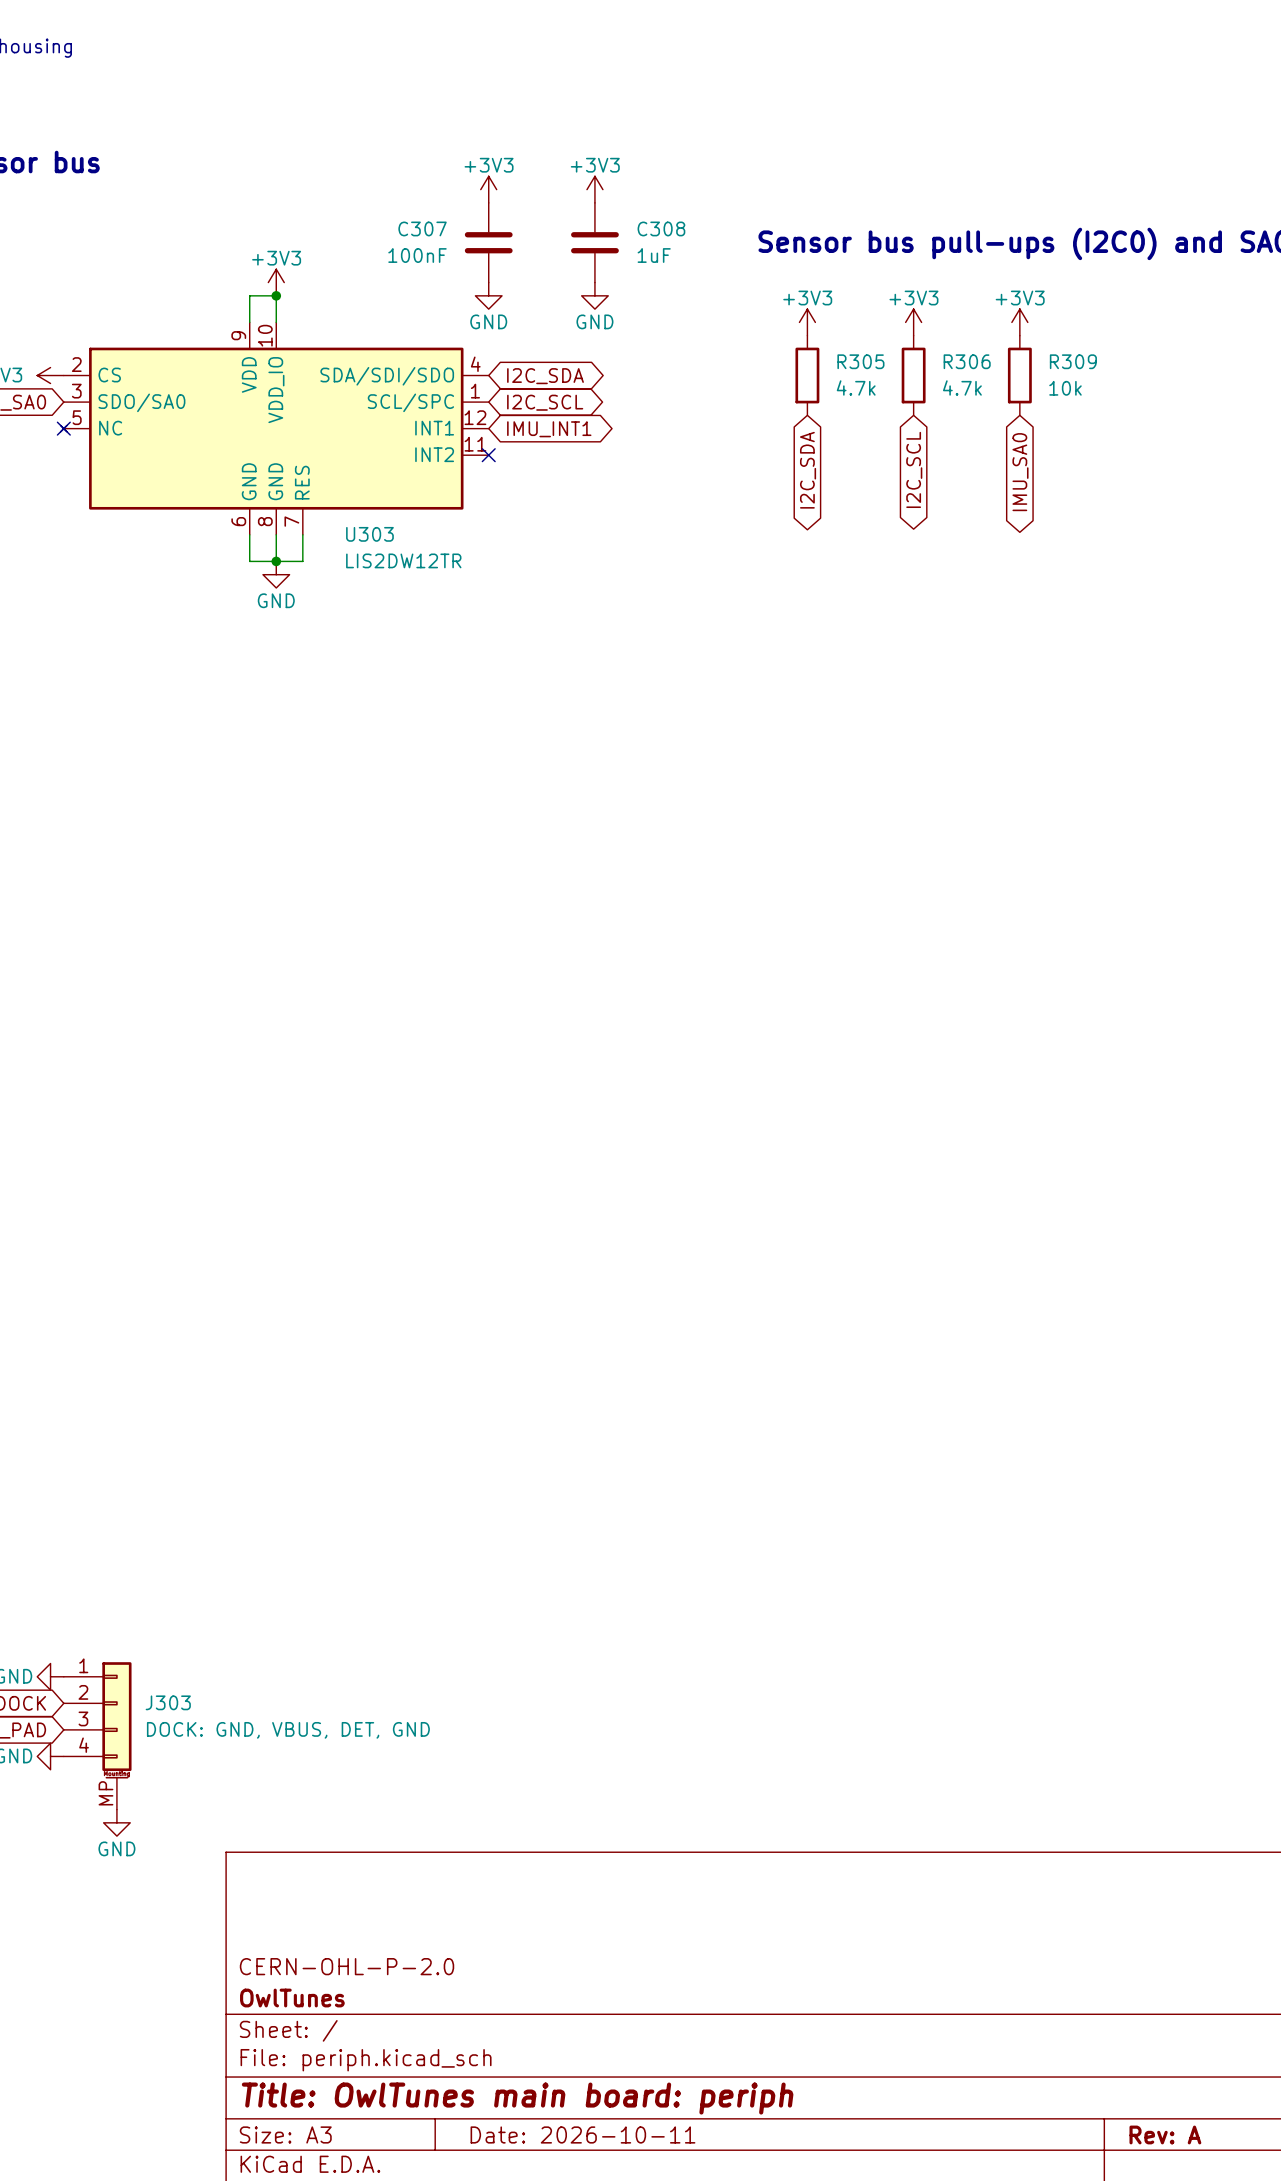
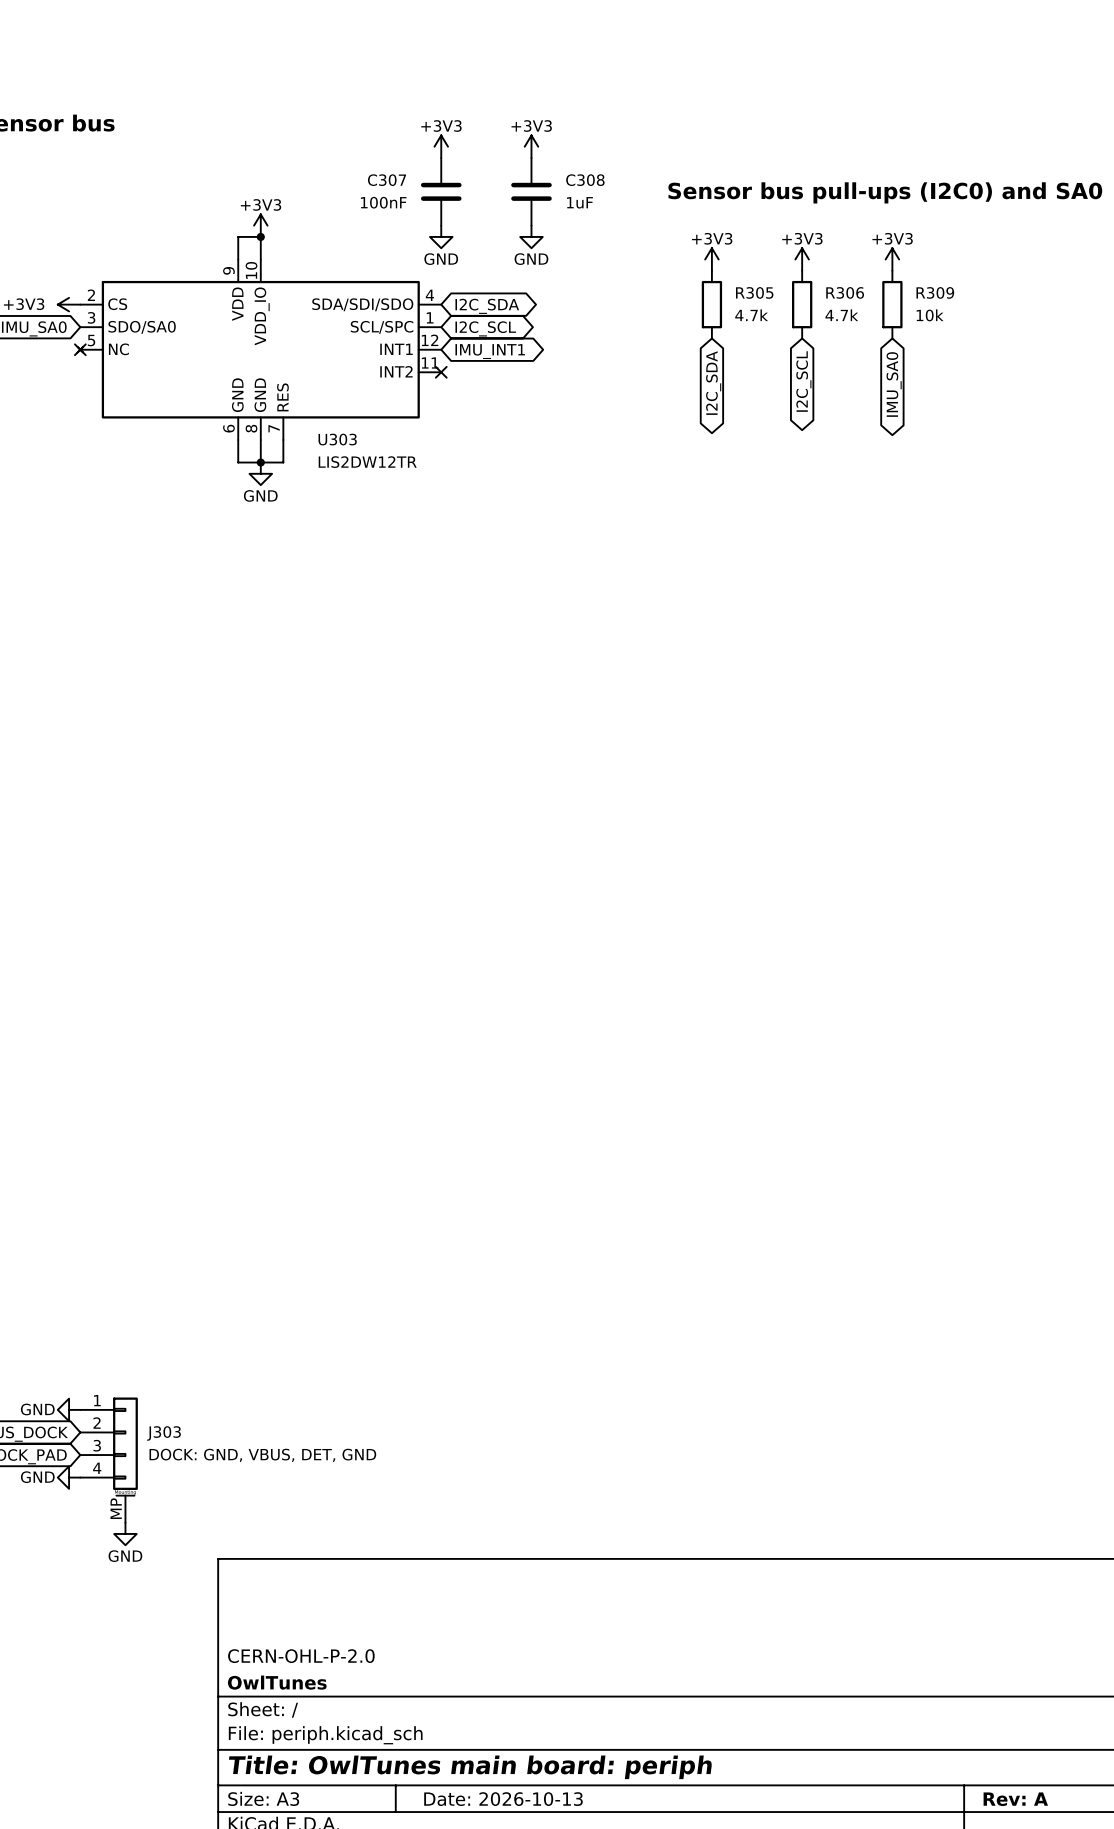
title block: Date: 2026-10-11 (582, 2134) -> Date: 2026-10-13 (503, 1799)

